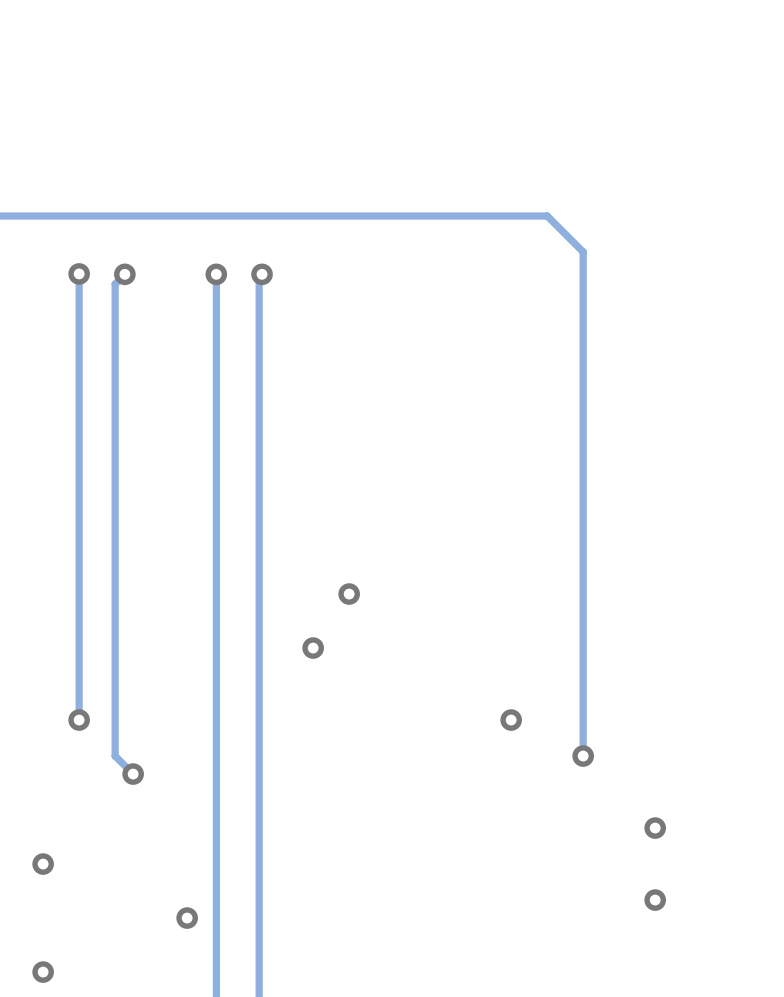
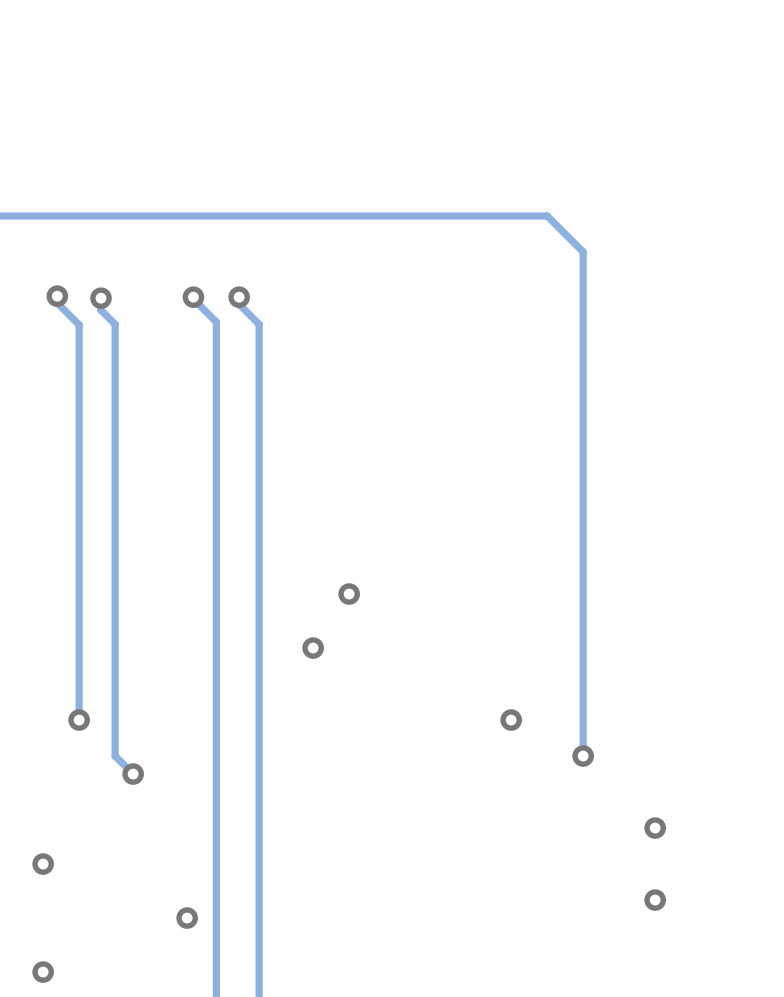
track: (79, 273) (79, 324) -> (57, 296) (57, 303) (79, 324)
via: (79, 273) -> none
track: (124, 274) (115, 284) (115, 324) -> (101, 298) (101, 310) (115, 324)
via: (124, 274) -> none
track: (216, 274) (216, 322) -> (193, 297) (216, 322)
via: (216, 274) -> none
track: (262, 274) (259, 277) (259, 324) -> (239, 297) (239, 304) (259, 324)
via: (262, 274) -> none
via: none -> (57, 296)
via: none -> (193, 297)
via: none -> (239, 297)
via: none -> (101, 298)

